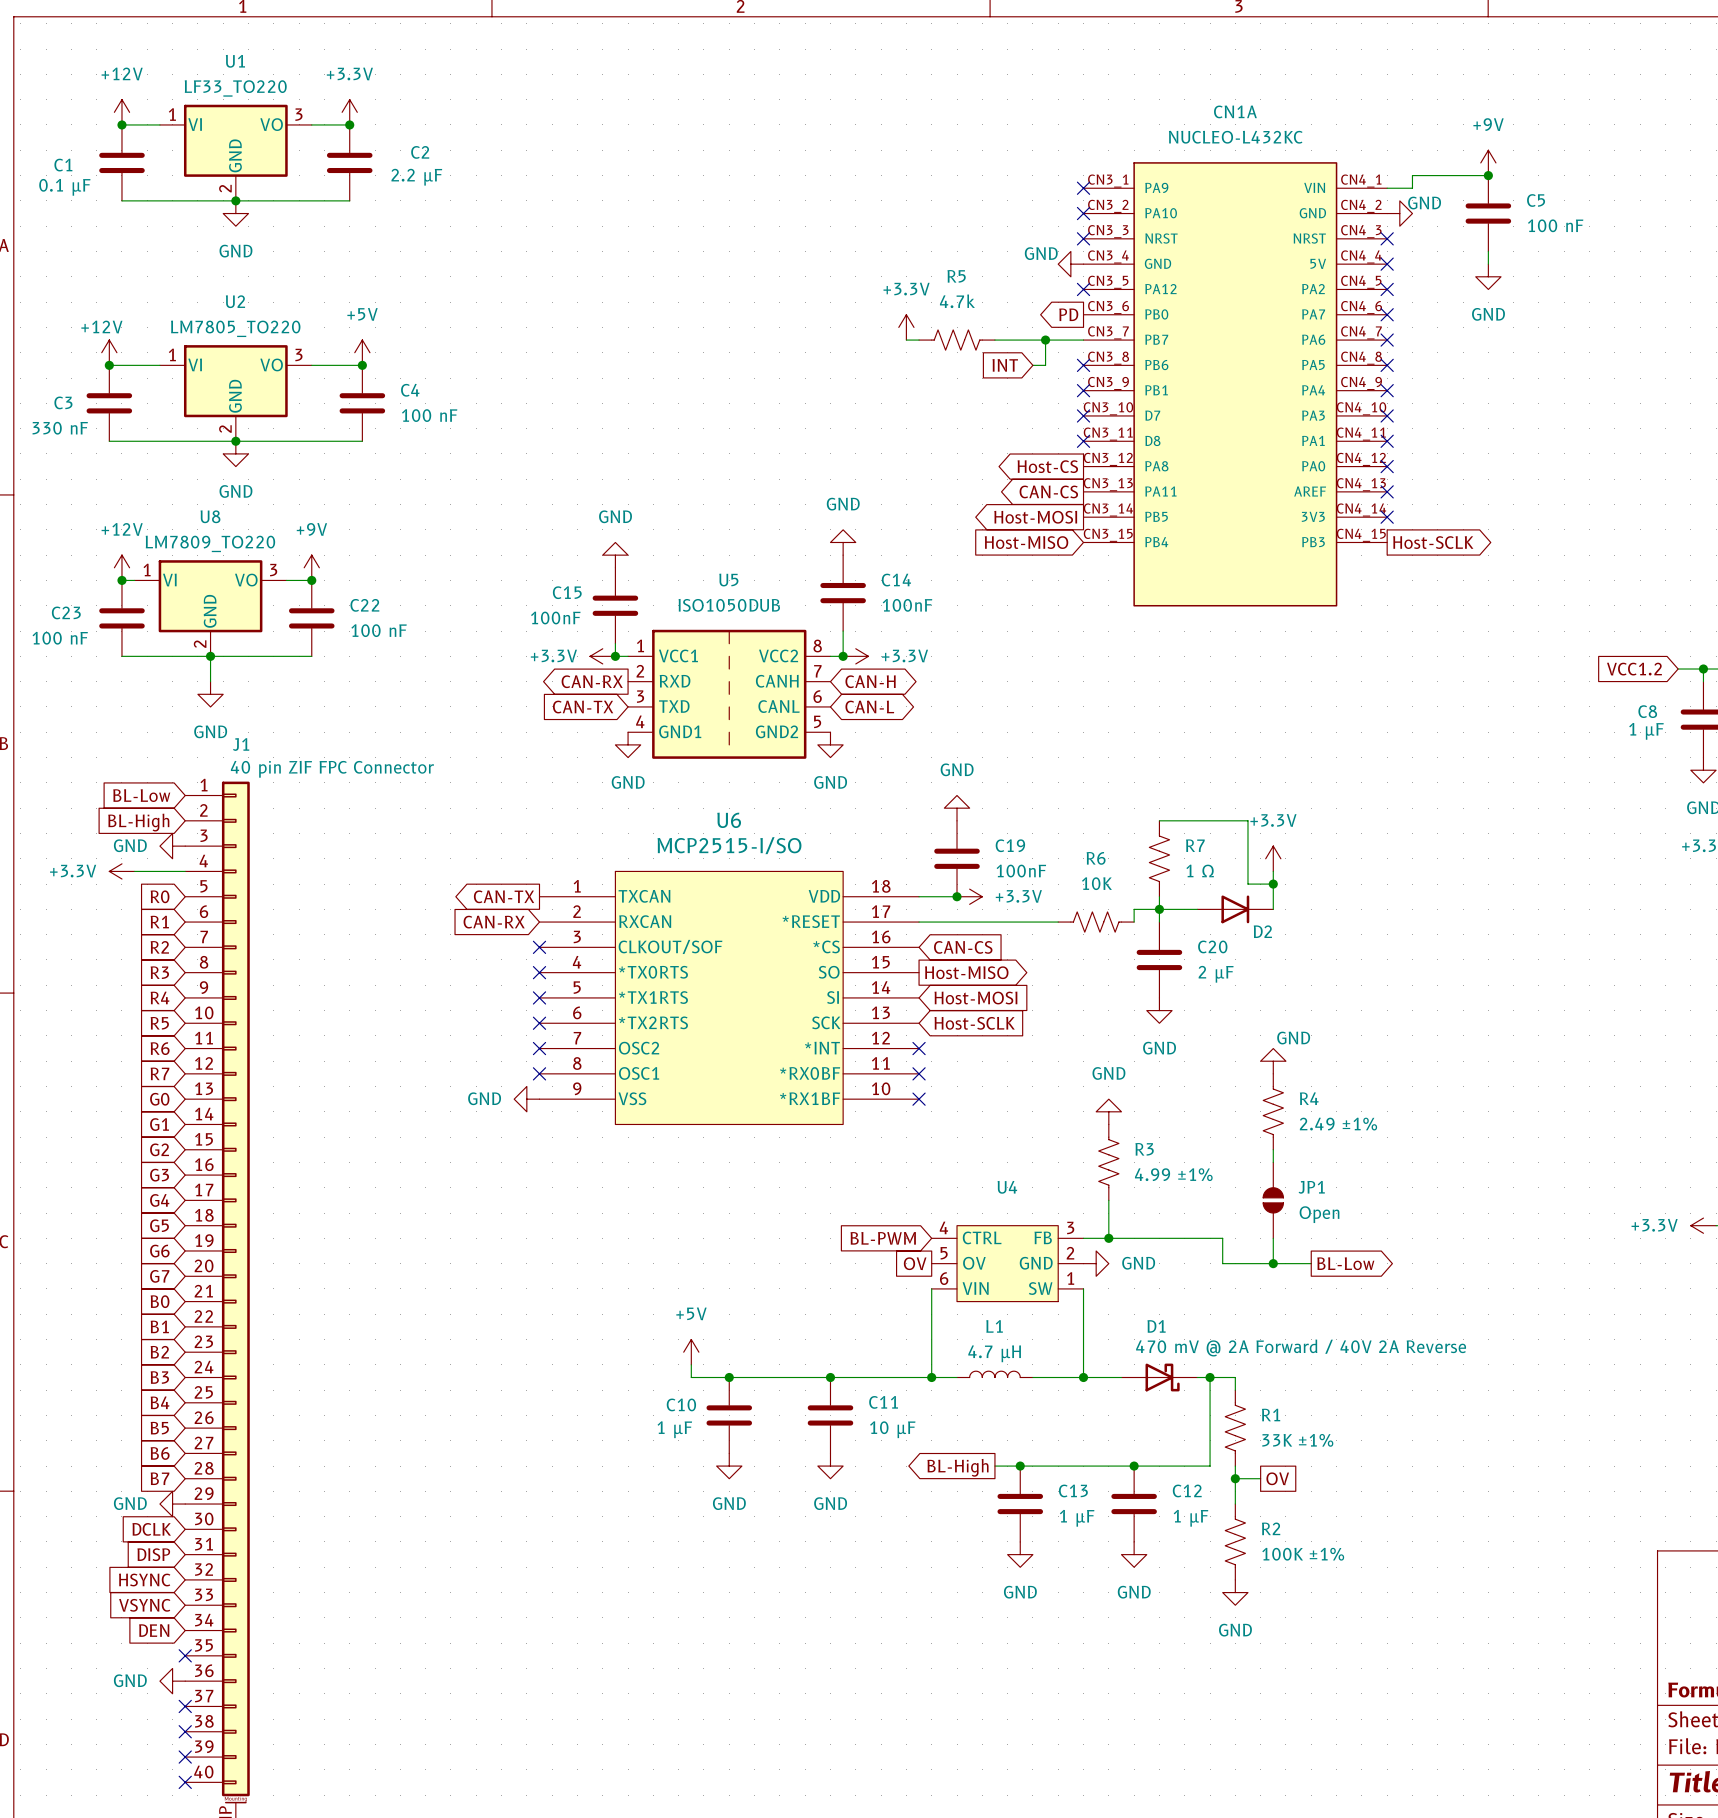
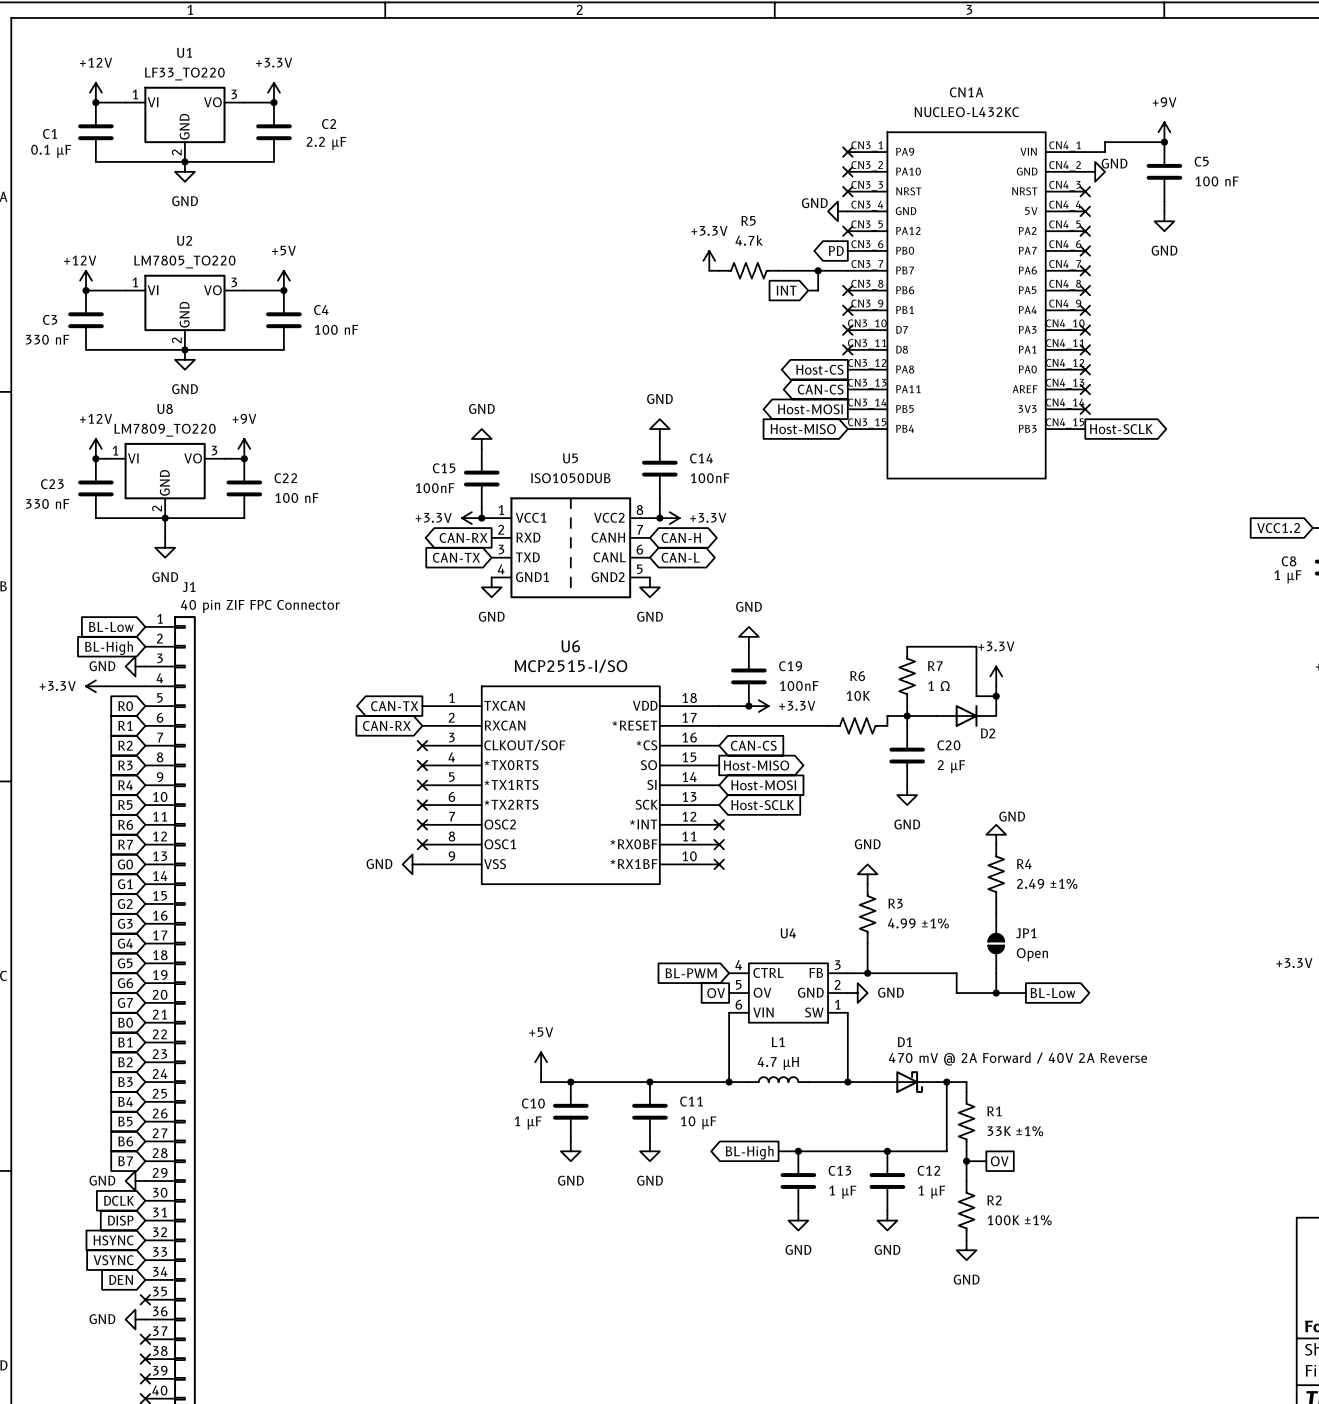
C23 value: 100 nF (60, 638) -> 330 nF (47, 503)

